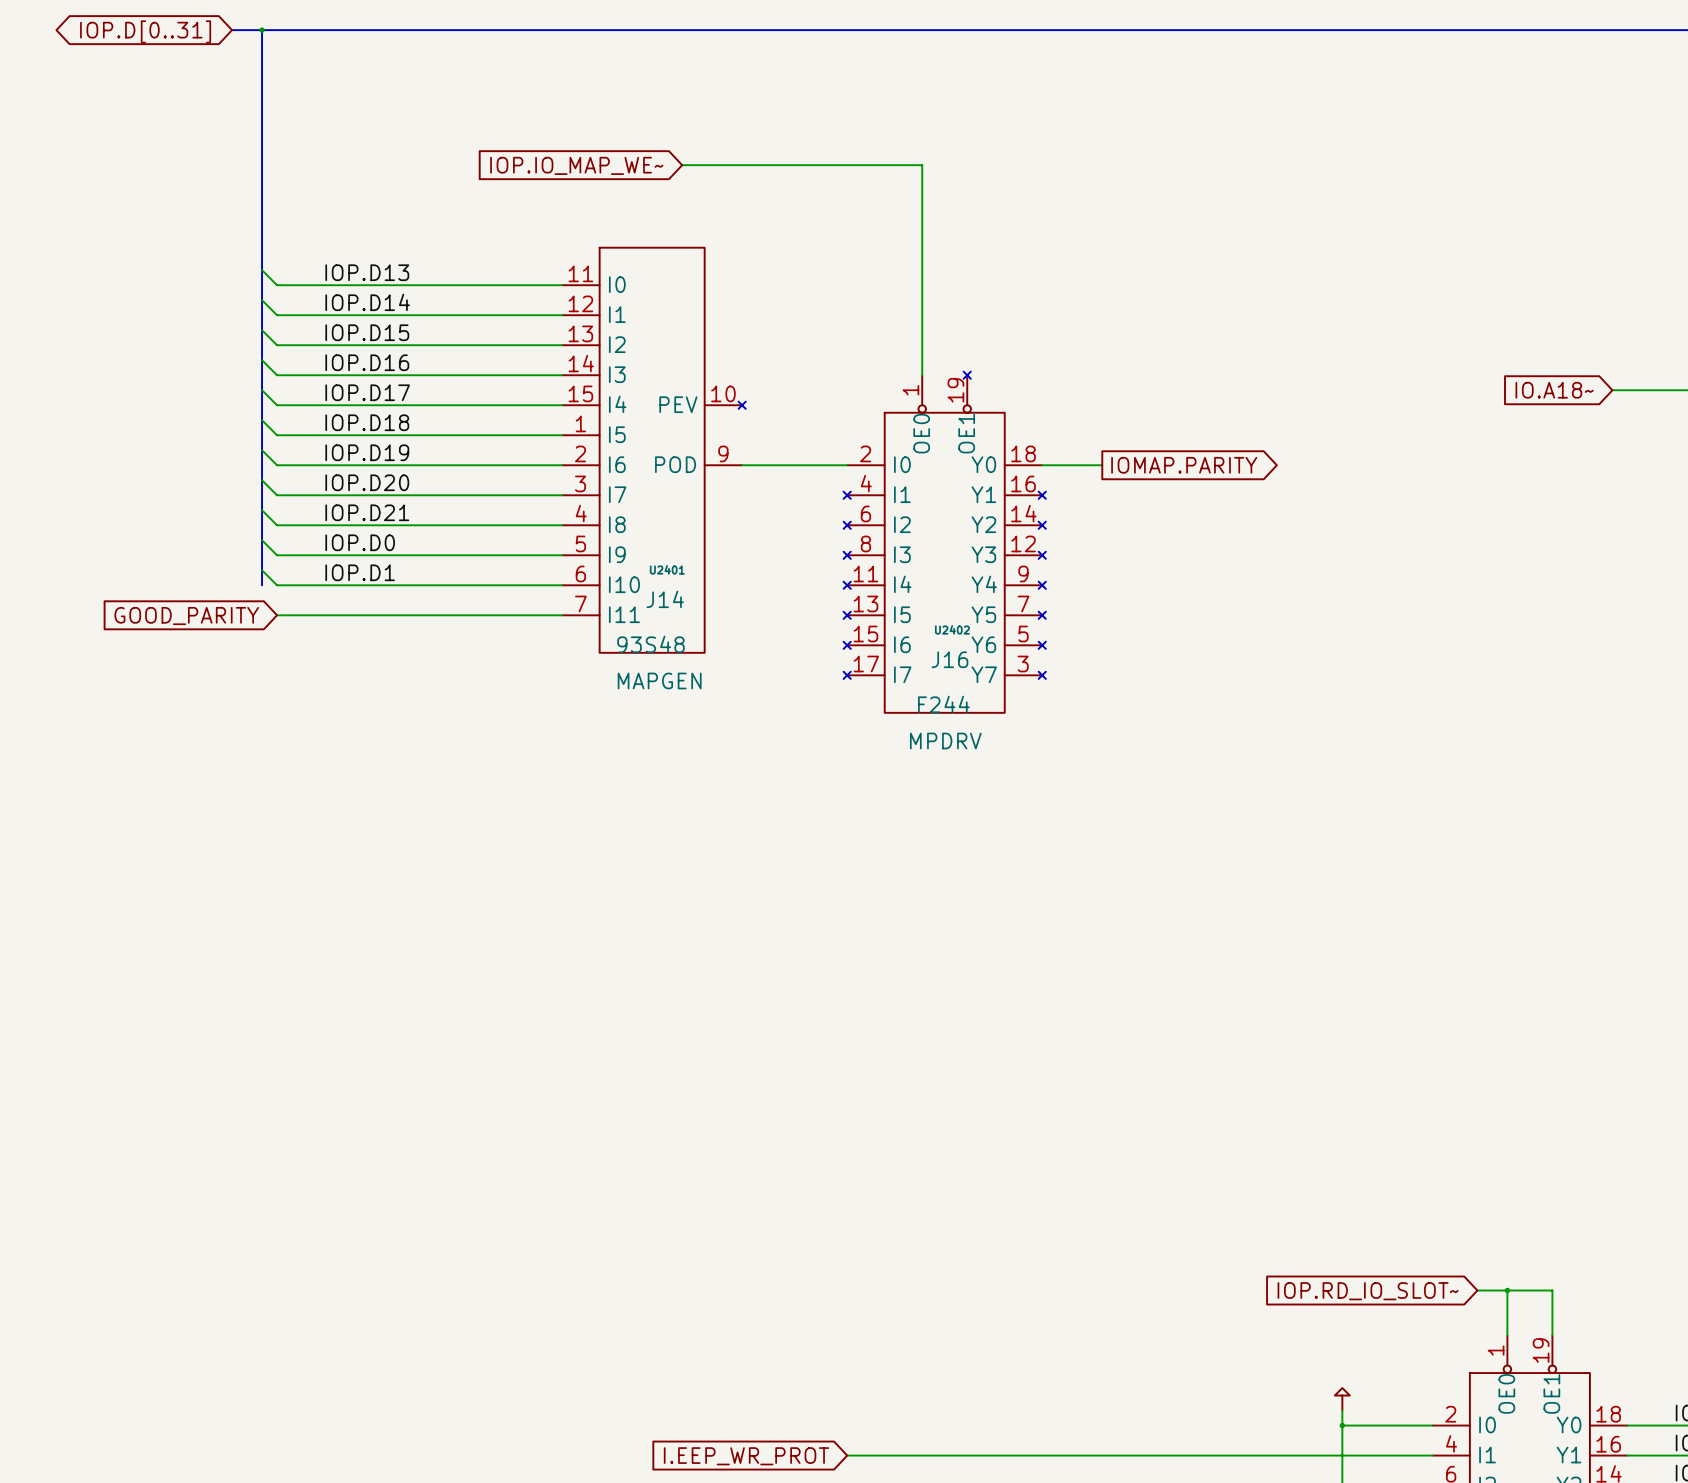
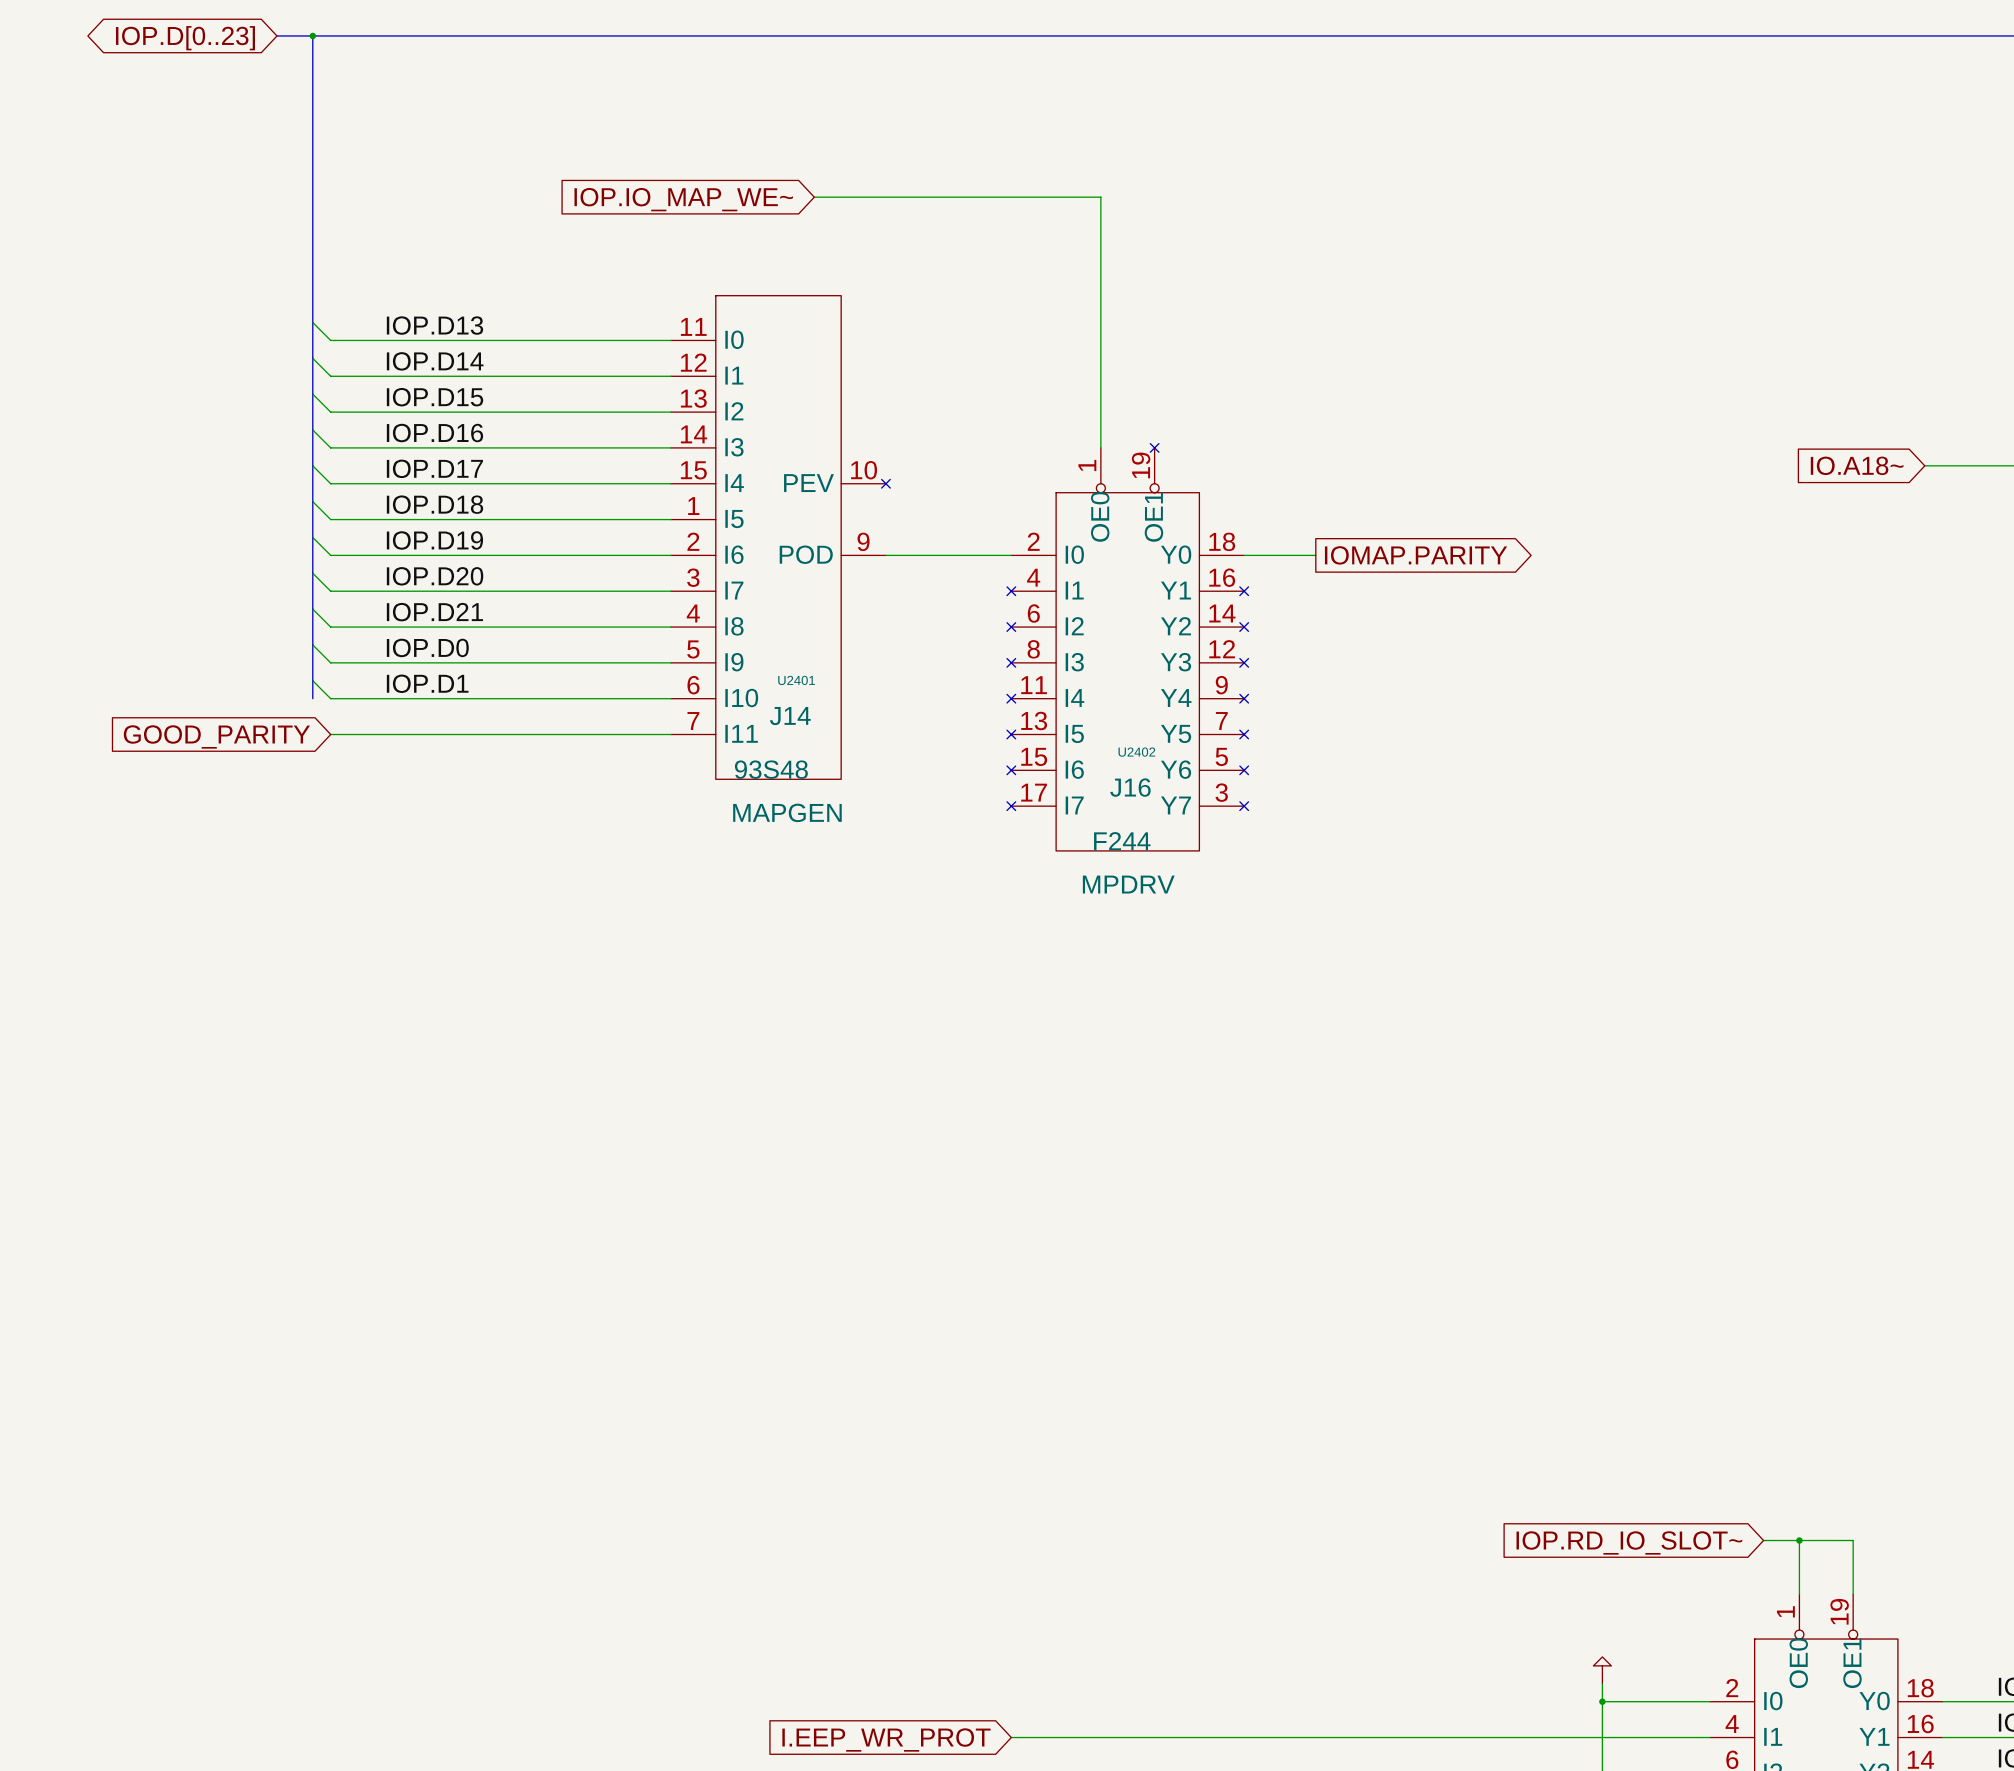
global label: IOP.D[0..31] (145, 31) -> IOP.D[0..23] (185, 38)

